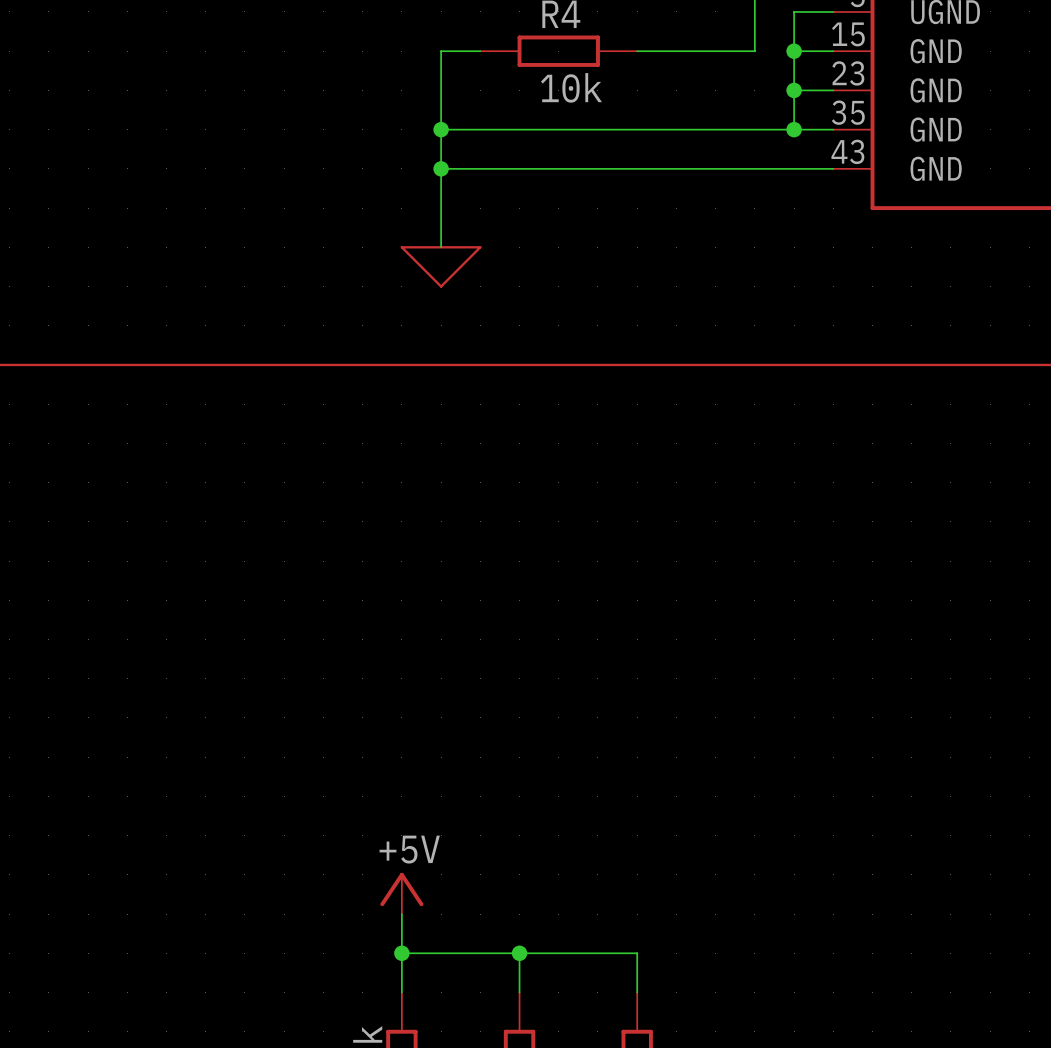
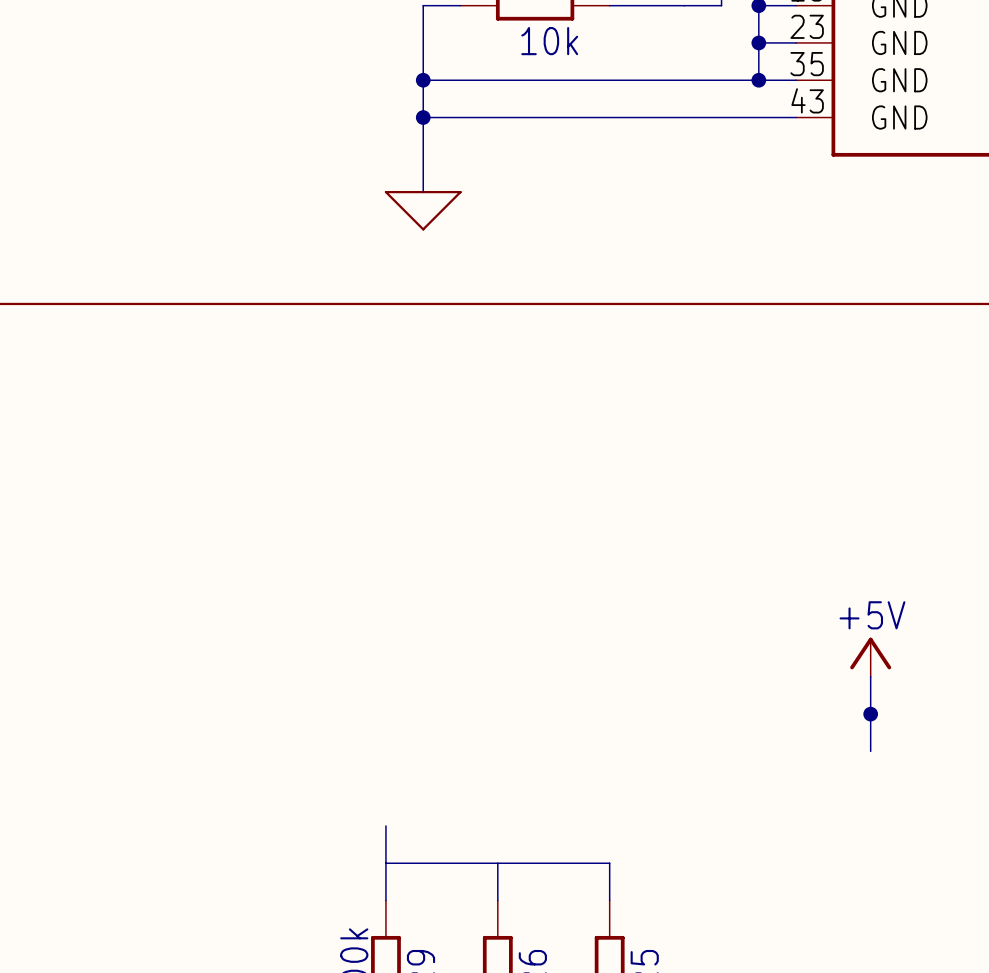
power symbol: none -> +5V (870, 657)
wire: none -> (870, 676) (870, 751)
junction: none -> (870, 714)
power symbol: +5V (401, 893) -> none
junction: (401, 953) -> none
junction: (519, 953) -> none

